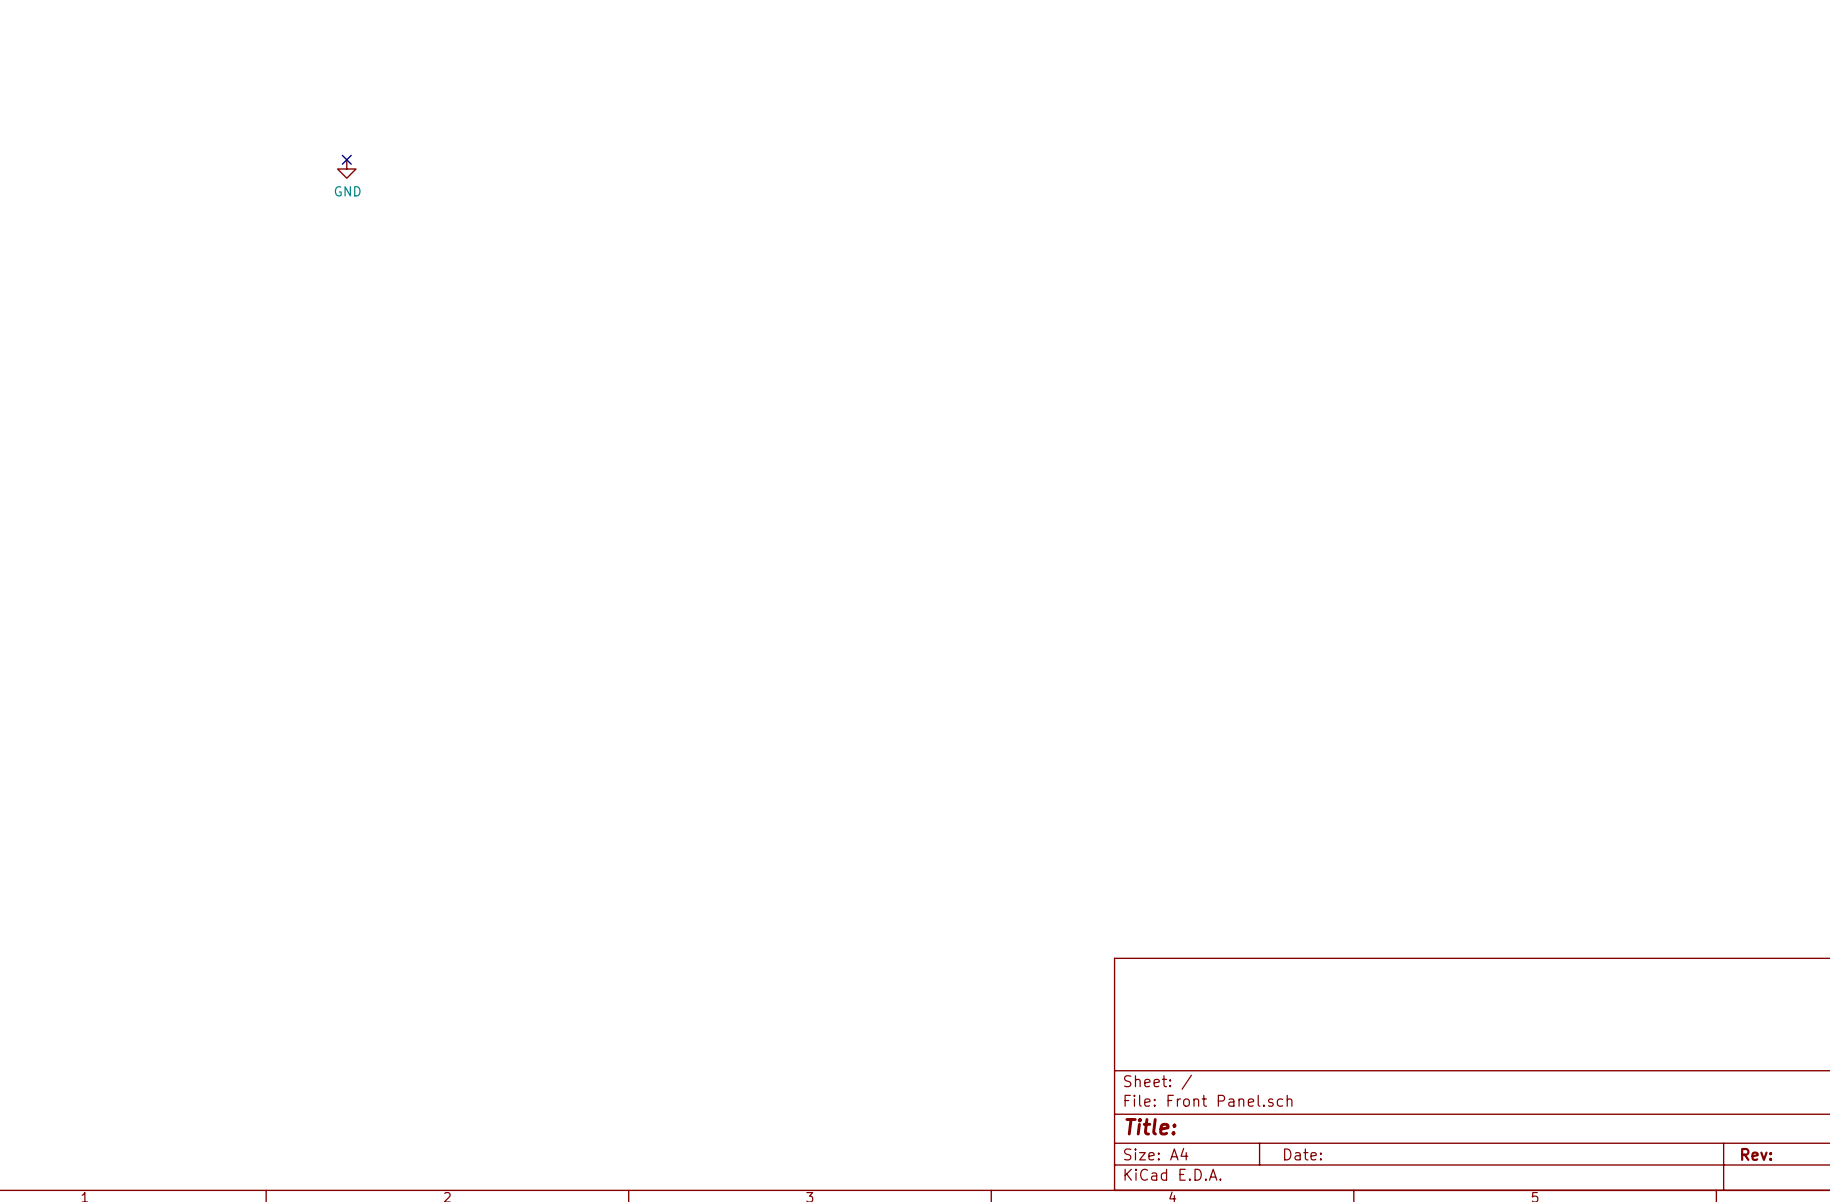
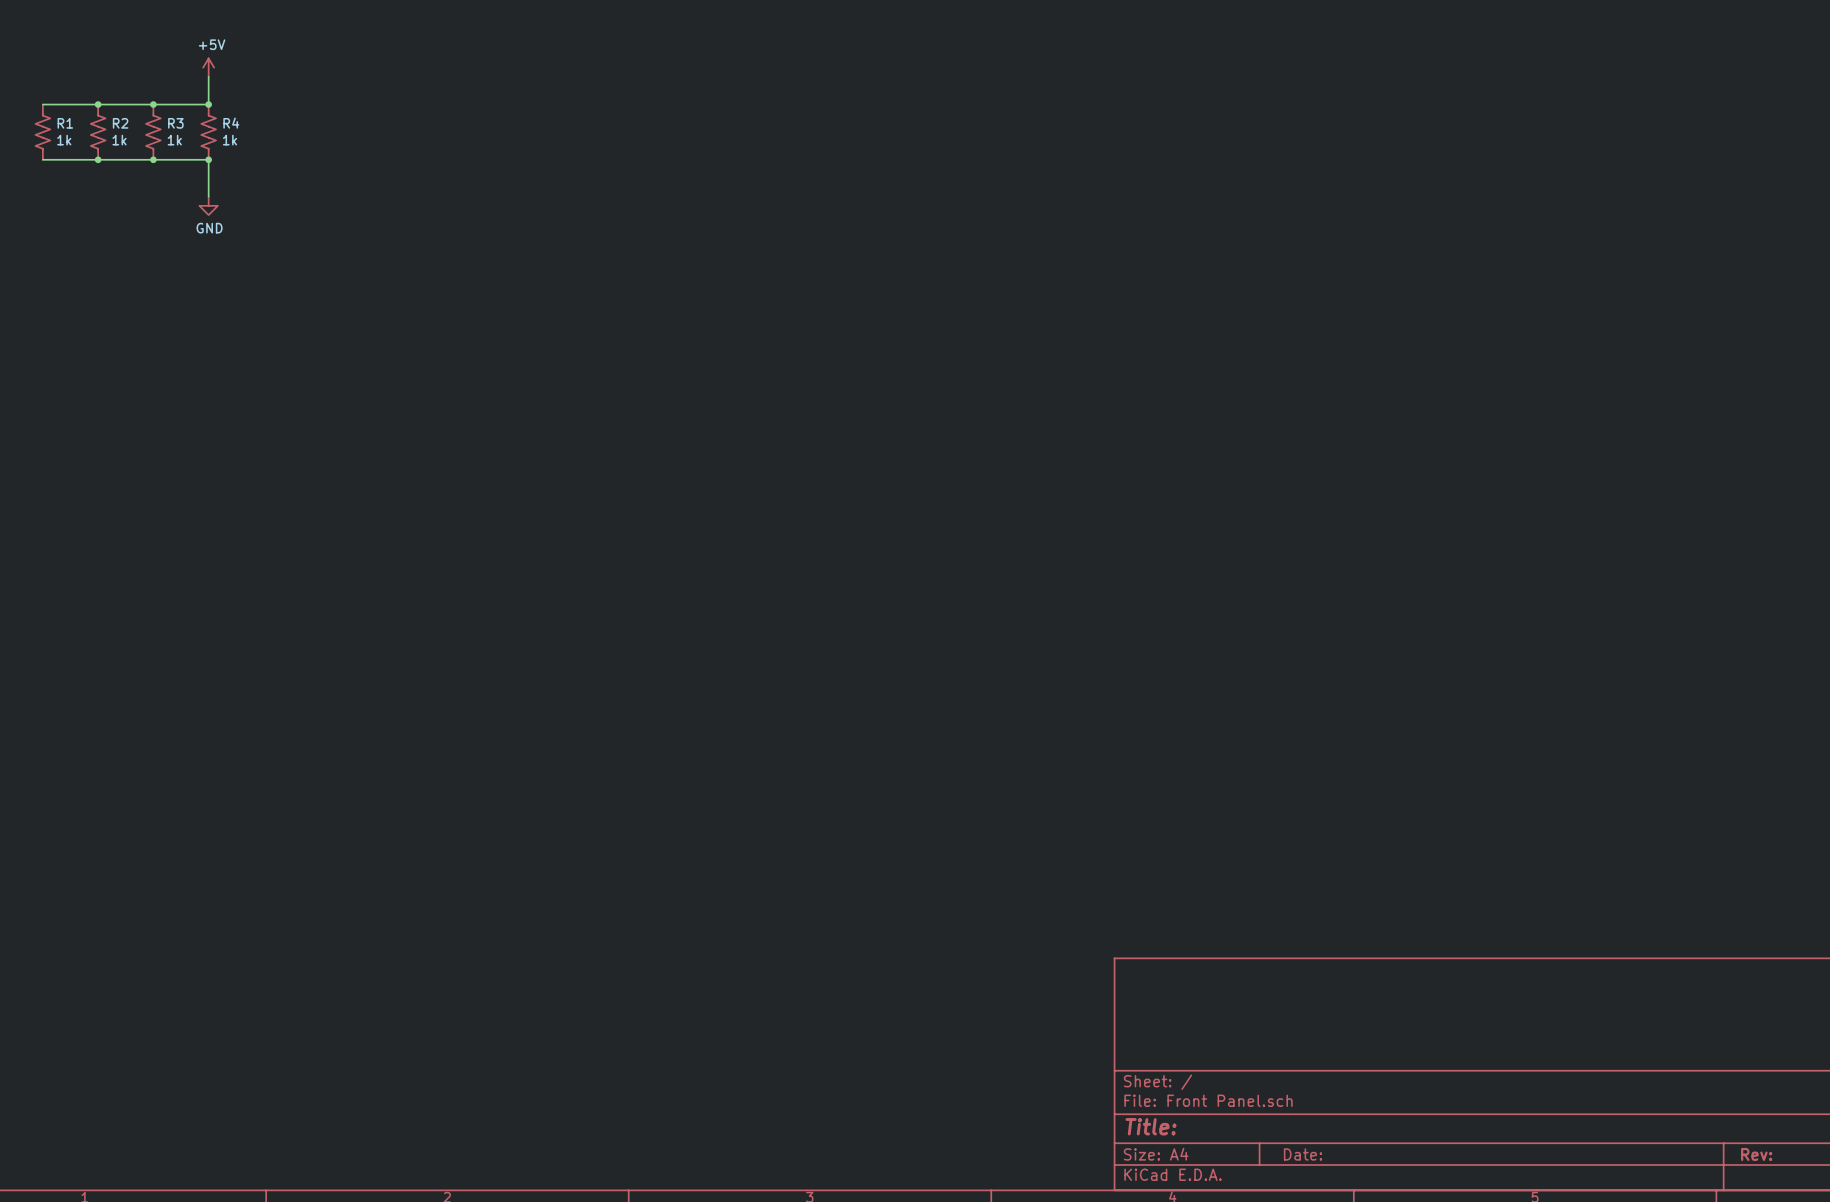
power symbol: none -> +5V (208, 67)
wire: none -> (208, 76) (208, 104) (42, 104)
junction: none -> (98, 104)
junction: none -> (153, 104)
junction: none -> (208, 104)
R1: none -> 1k (42, 132)
R2: none -> 1k (98, 132)
R3: none -> 1k (153, 132)
R4: none -> 1k (208, 132)
wire: none -> (42, 159) (208, 159) (208, 196)
junction: none -> (98, 159)
junction: none -> (153, 159)
junction: none -> (208, 159)
no-connect mark: (346, 159) -> none
power symbol position: GND (346, 169) -> GND (208, 205)

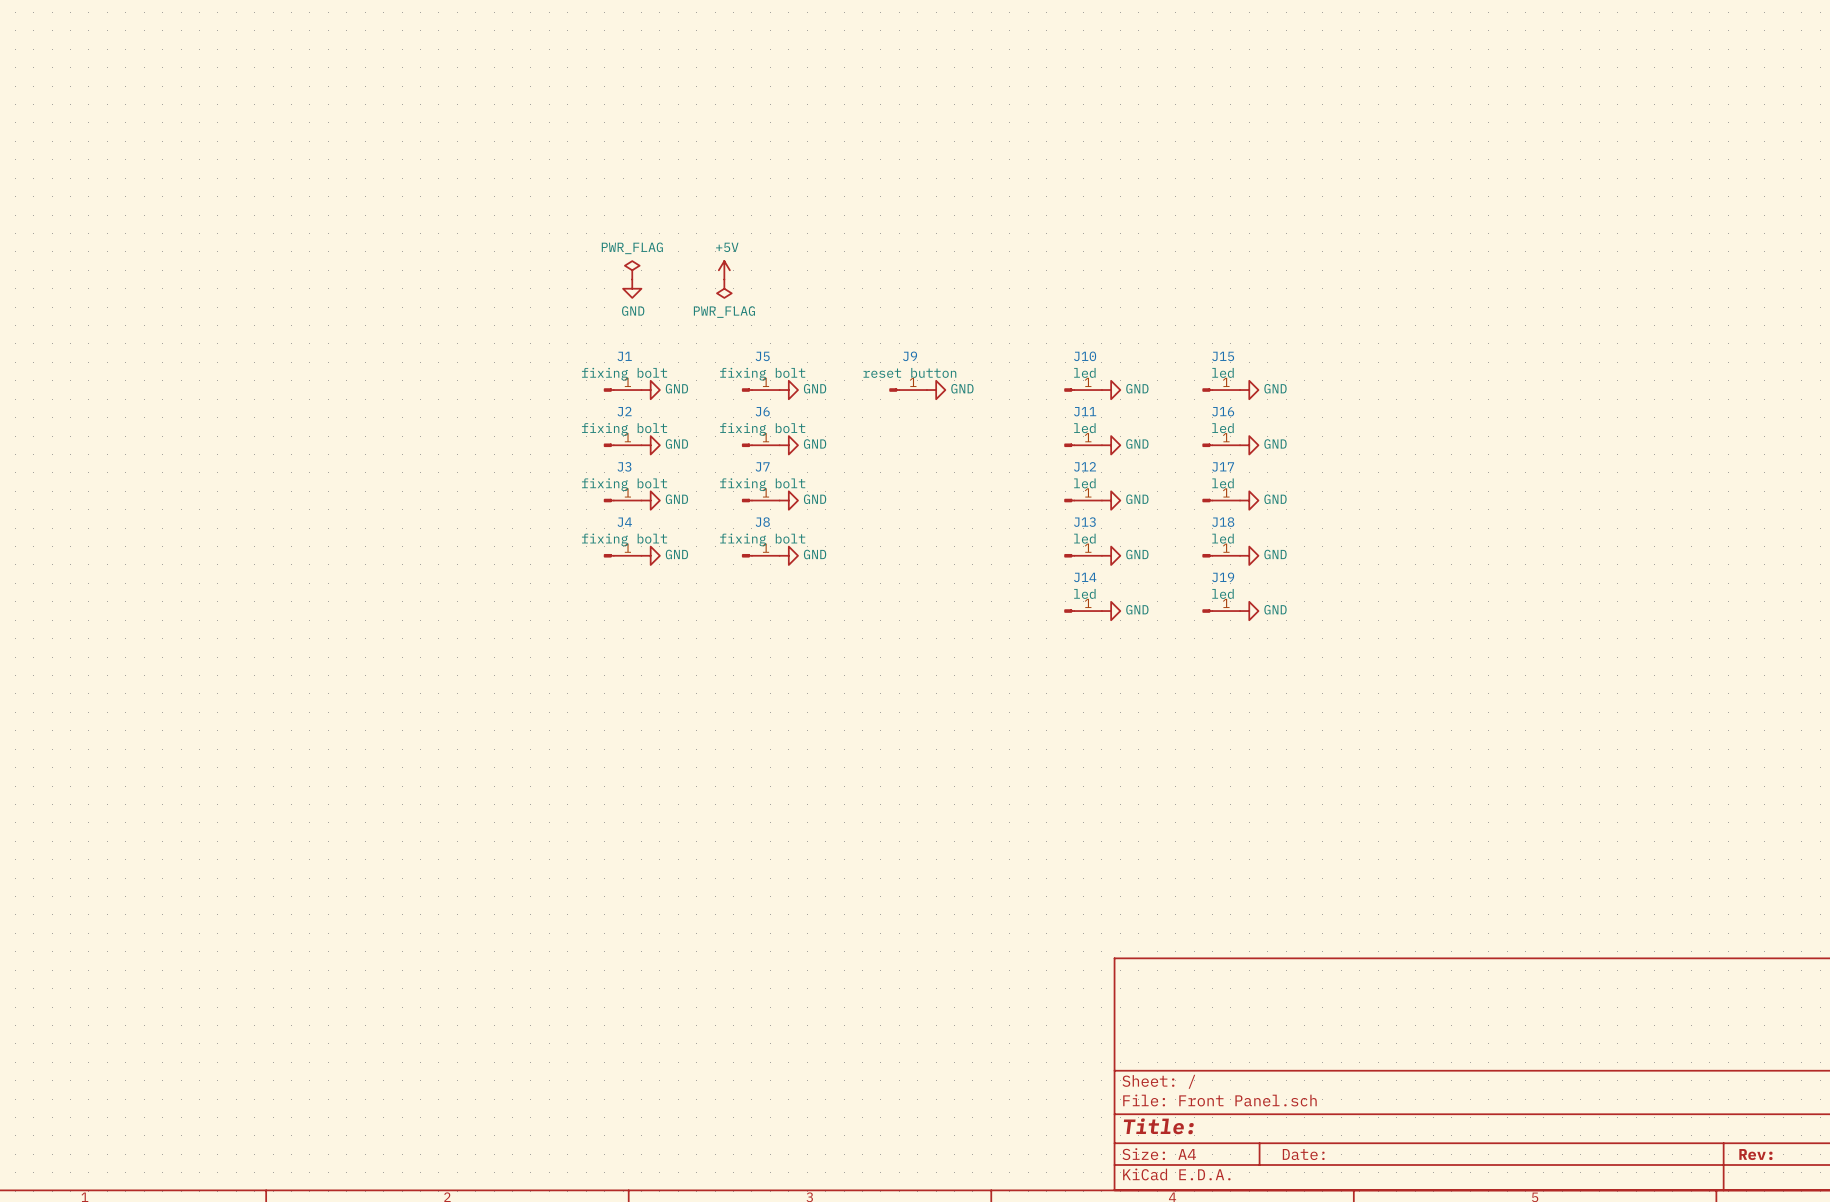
power symbol: +5V (208, 67) -> none
wire: (208, 76) (208, 104) (42, 104) -> none
junction: (98, 104) -> none
junction: (153, 104) -> none
junction: (208, 104) -> none
R1: 1k (42, 132) -> none
R2: 1k (98, 132) -> none
R3: 1k (153, 132) -> none
R4: 1k (208, 132) -> none
wire: (42, 159) (208, 159) (208, 196) -> none
junction: (98, 159) -> none
junction: (153, 159) -> none
junction: (208, 159) -> none
power symbol: GND (208, 205) -> none
power symbol: none -> PWR_FLAG (632, 270)
power symbol: none -> +5V (724, 270)
power symbol: none -> GND (632, 288)
power symbol: none -> PWR_FLAG (724, 288)
J1: none -> fixing bolt (622, 390)
power symbol: none -> GND (650, 390)
J5: none -> fixing bolt (760, 390)
power symbol: none -> GND (788, 390)
J9: none -> reset button (908, 390)
power symbol: none -> GND (936, 390)
J10: none -> led (1083, 390)
power symbol: none -> GND (1111, 390)
J15: none -> led (1221, 390)
power symbol: none -> GND (1249, 390)
J2: none -> fixing bolt (622, 445)
power symbol: none -> GND (650, 445)
J6: none -> fixing bolt (760, 445)
power symbol: none -> GND (788, 445)
J11: none -> led (1083, 445)
power symbol: none -> GND (1111, 445)
J16: none -> led (1221, 445)
power symbol: none -> GND (1249, 445)
J3: none -> fixing bolt (622, 500)
power symbol: none -> GND (650, 500)
J7: none -> fixing bolt (760, 500)
power symbol: none -> GND (788, 500)
J12: none -> led (1083, 500)
power symbol: none -> GND (1111, 500)
J17: none -> led (1221, 500)
power symbol: none -> GND (1249, 500)
J4: none -> fixing bolt (622, 555)
power symbol: none -> GND (650, 555)
J8: none -> fixing bolt (760, 555)
power symbol: none -> GND (788, 555)
J13: none -> led (1083, 555)
power symbol: none -> GND (1111, 555)
J18: none -> led (1221, 555)
power symbol: none -> GND (1249, 555)
J14: none -> led (1083, 611)
power symbol: none -> GND (1111, 611)
J19: none -> led (1221, 611)
power symbol: none -> GND (1249, 611)

